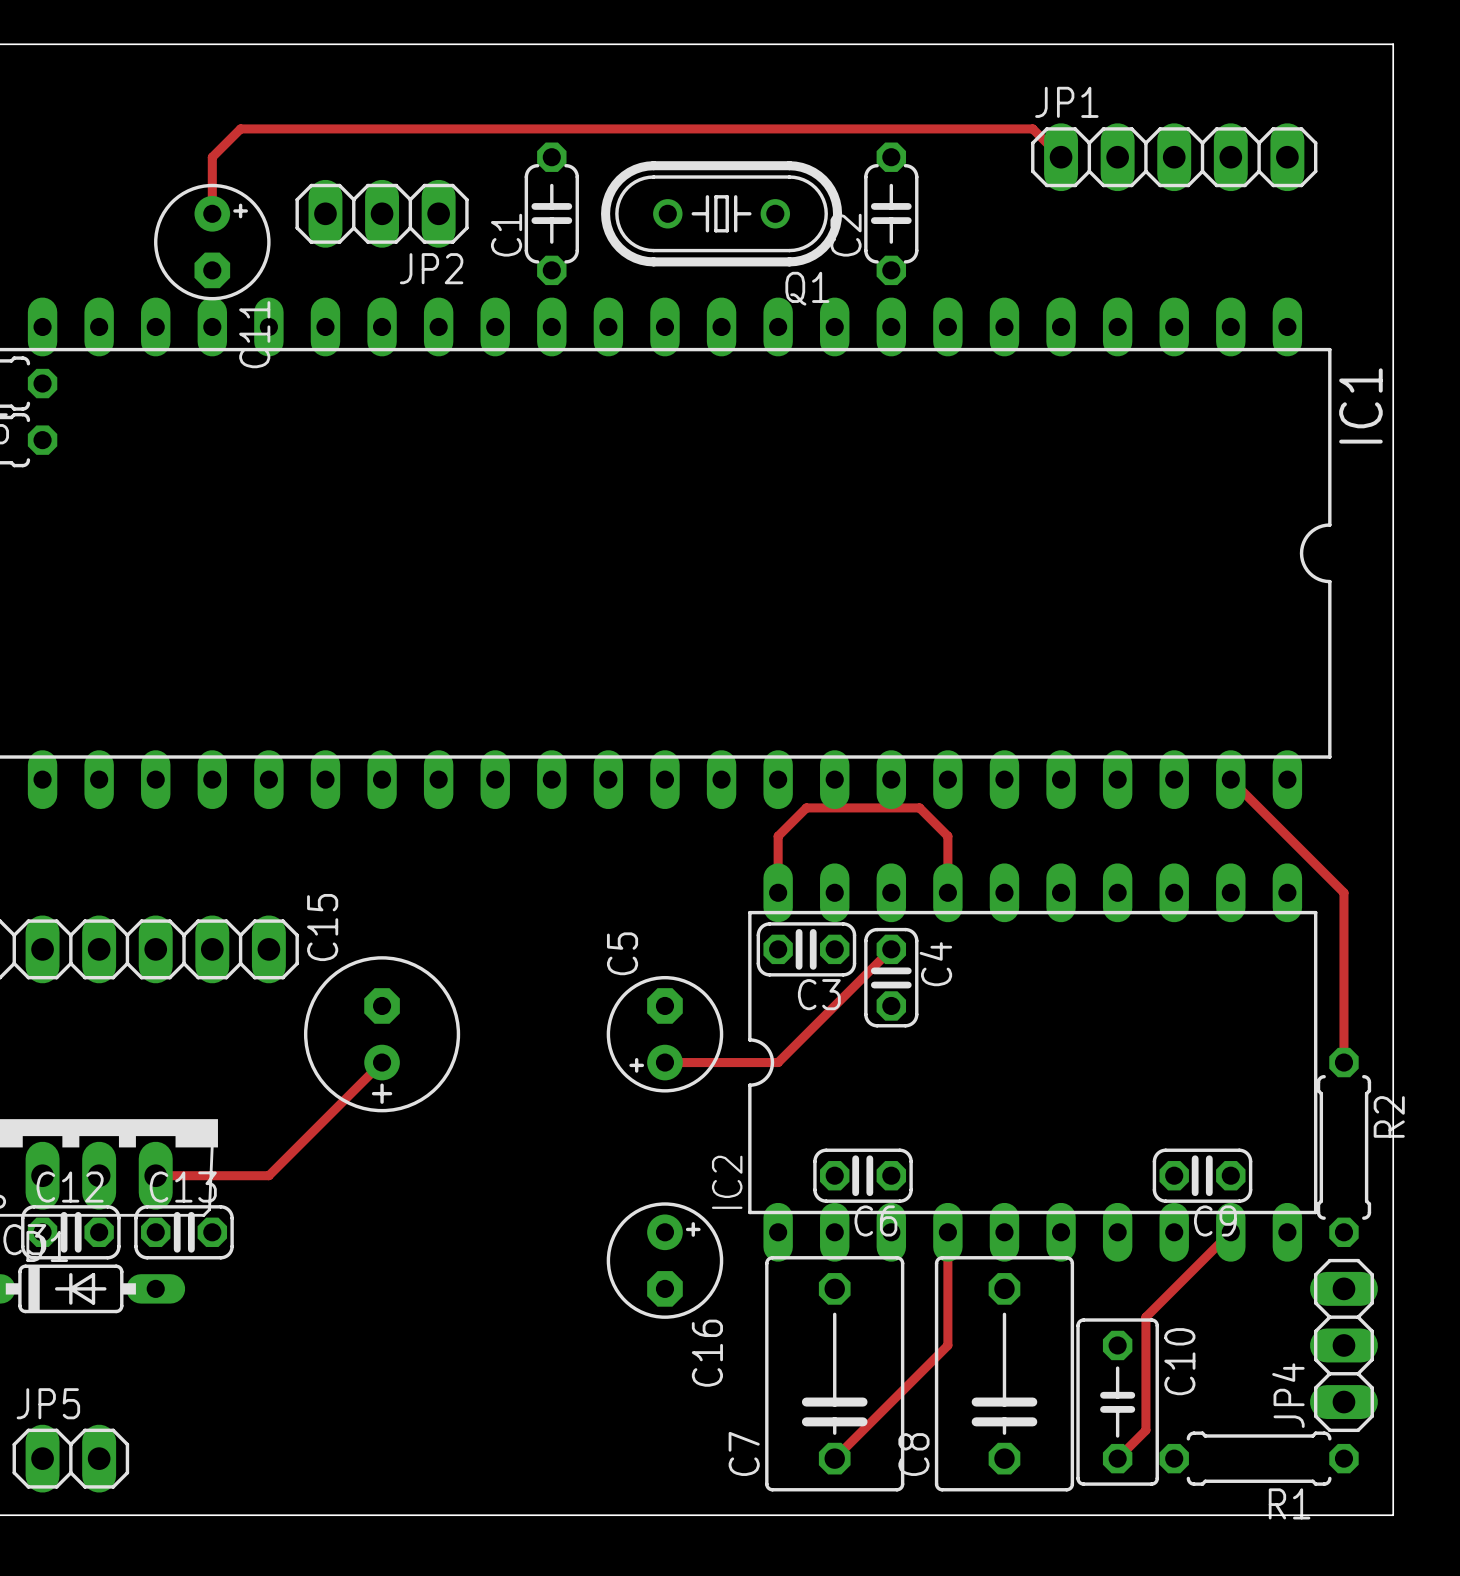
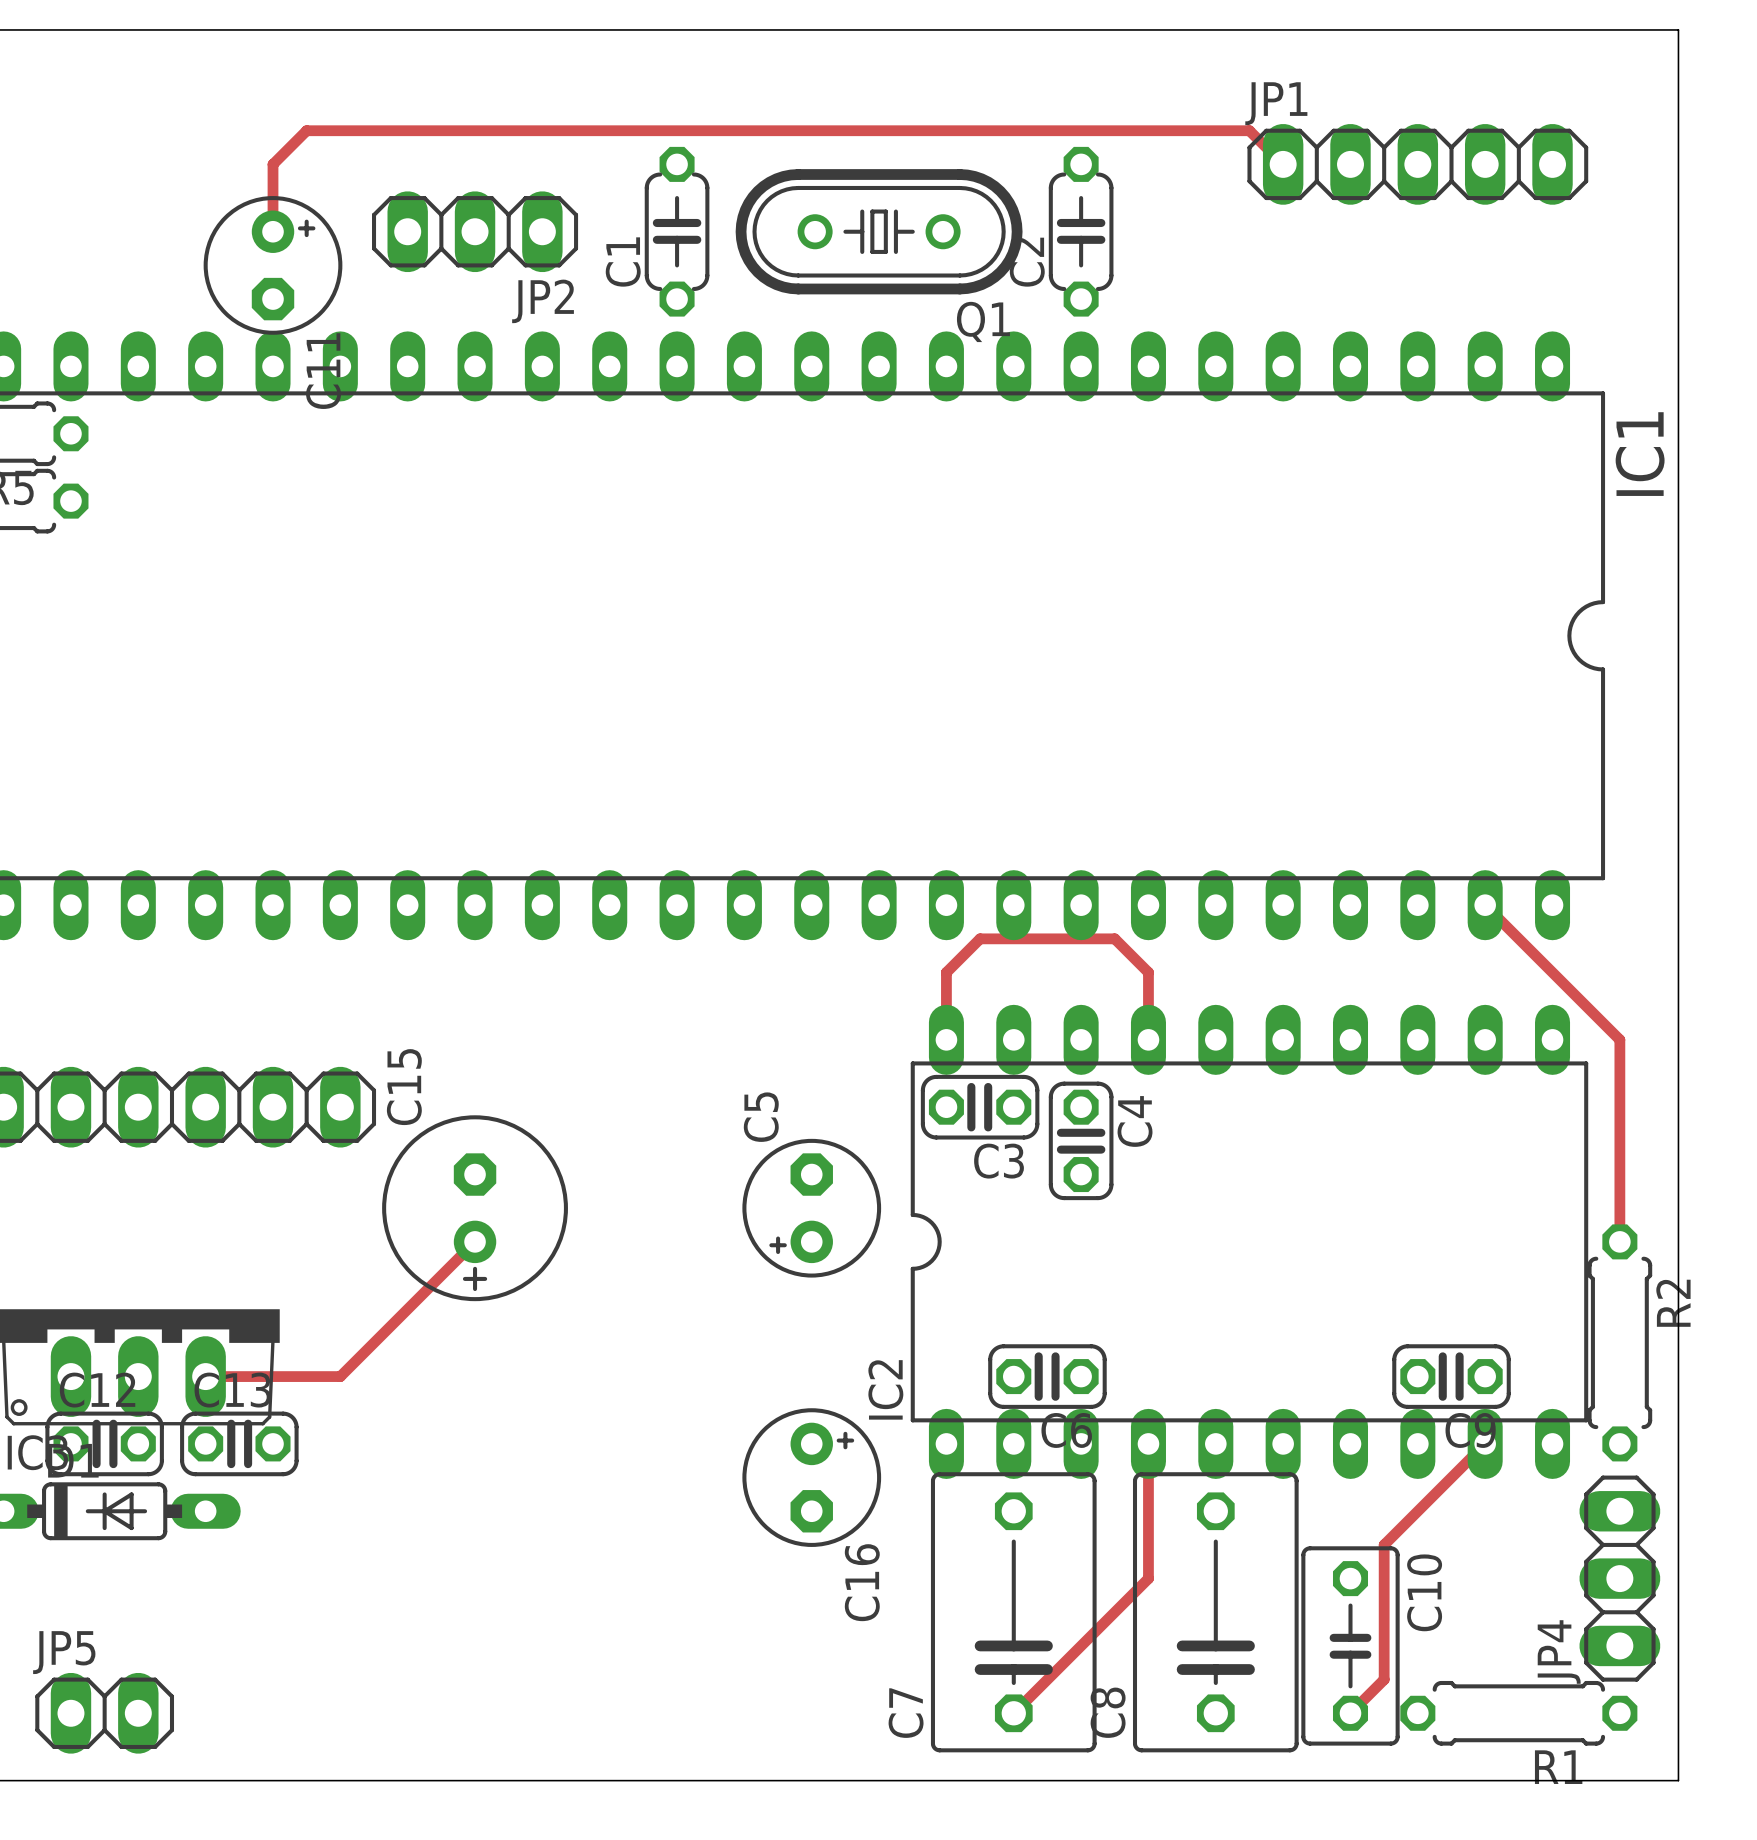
track: (891, 949) (778, 1062) (664, 1062) -> none

